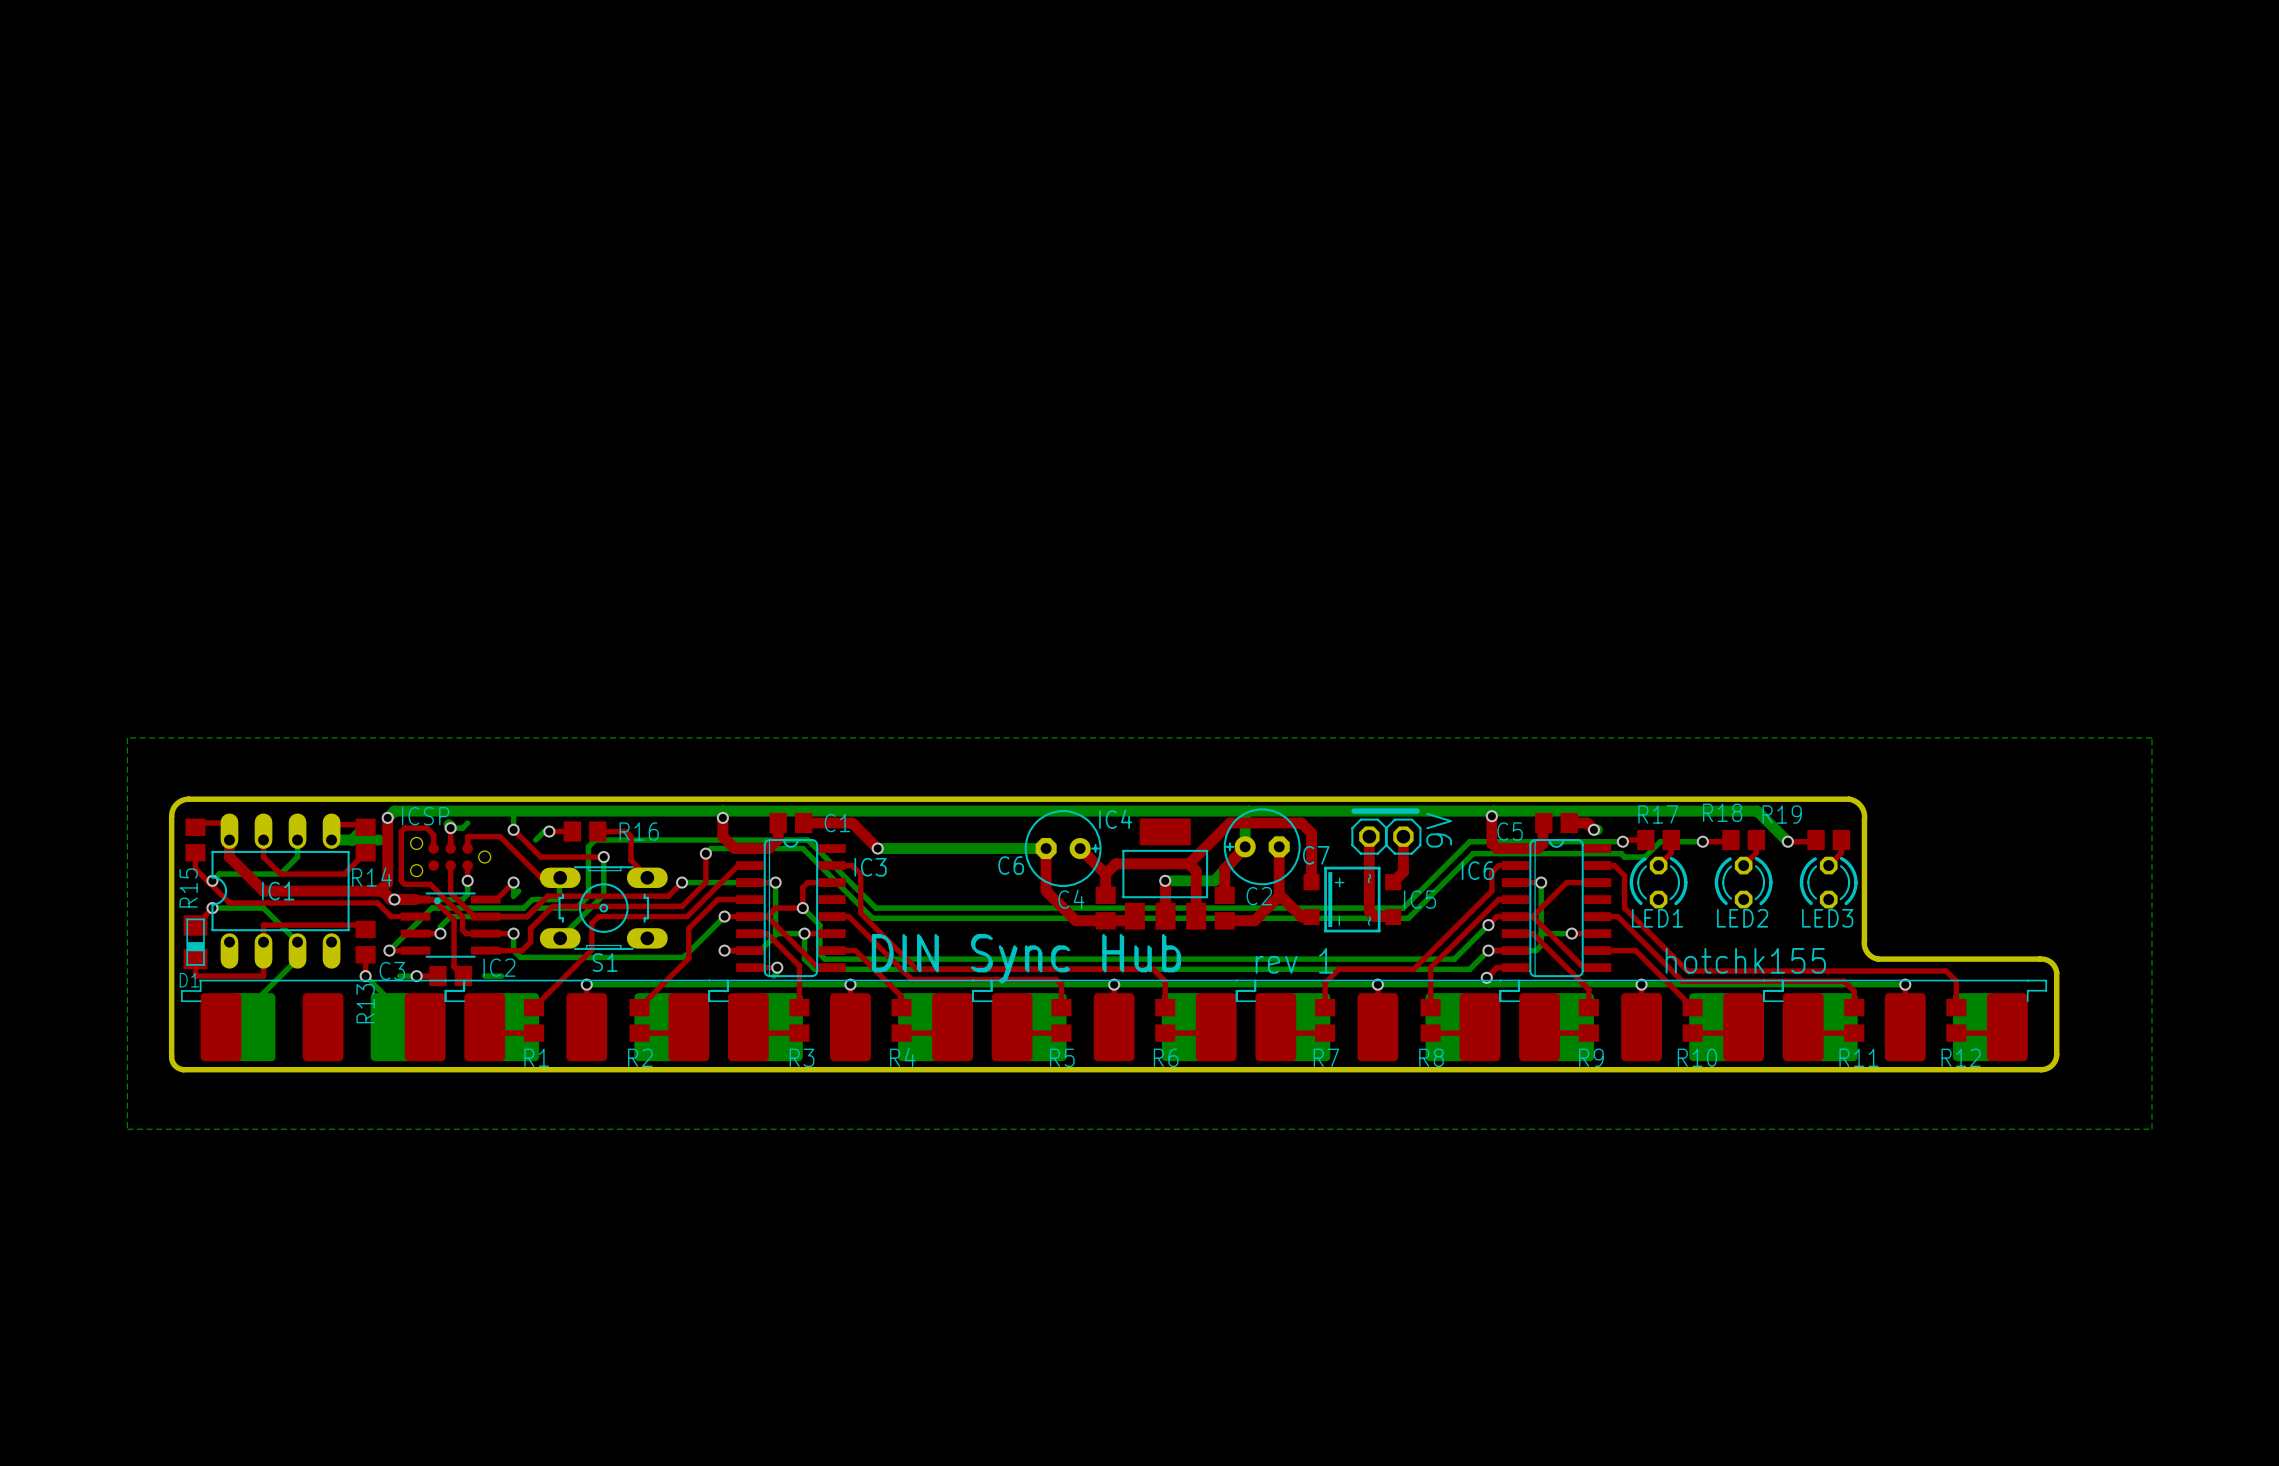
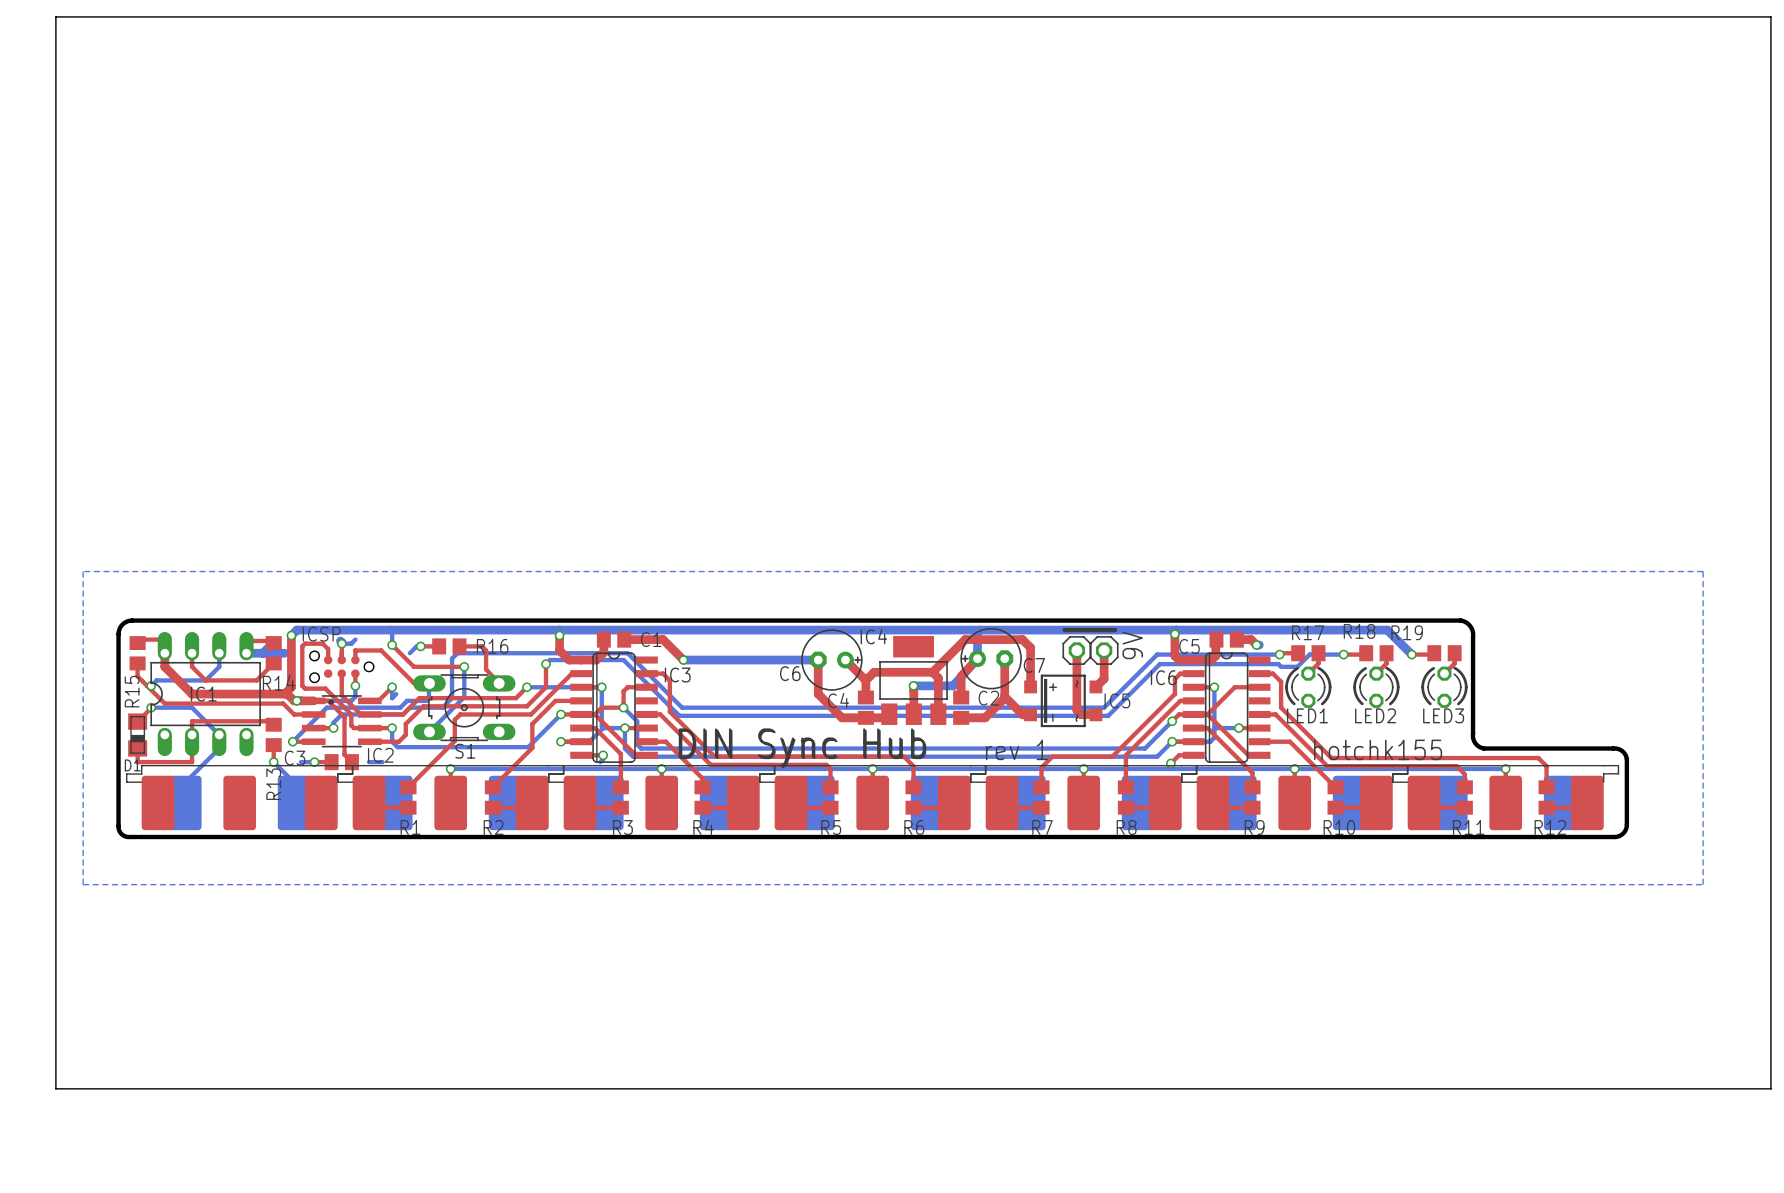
board edge: none -> (55, 16) (1770, 16) (1770, 1088) (55, 1088) (55, 16)

